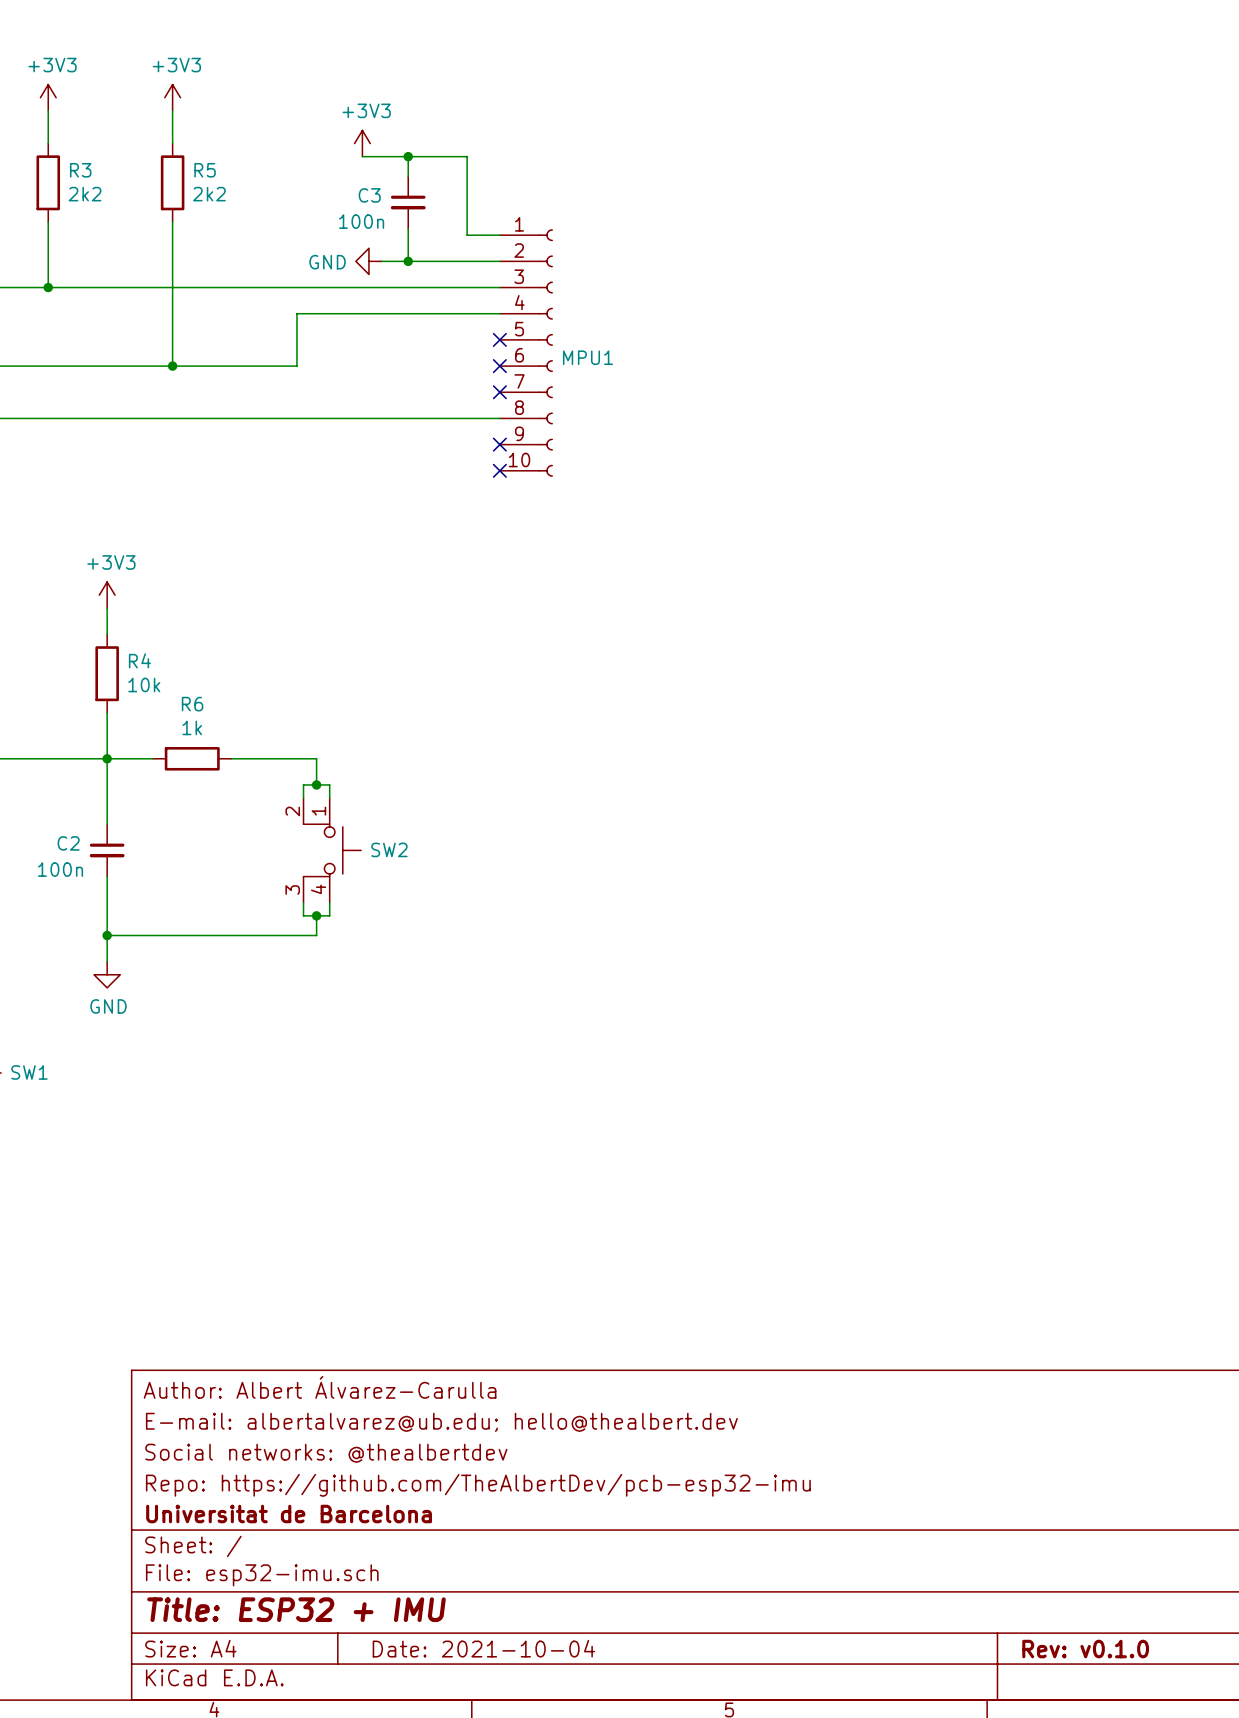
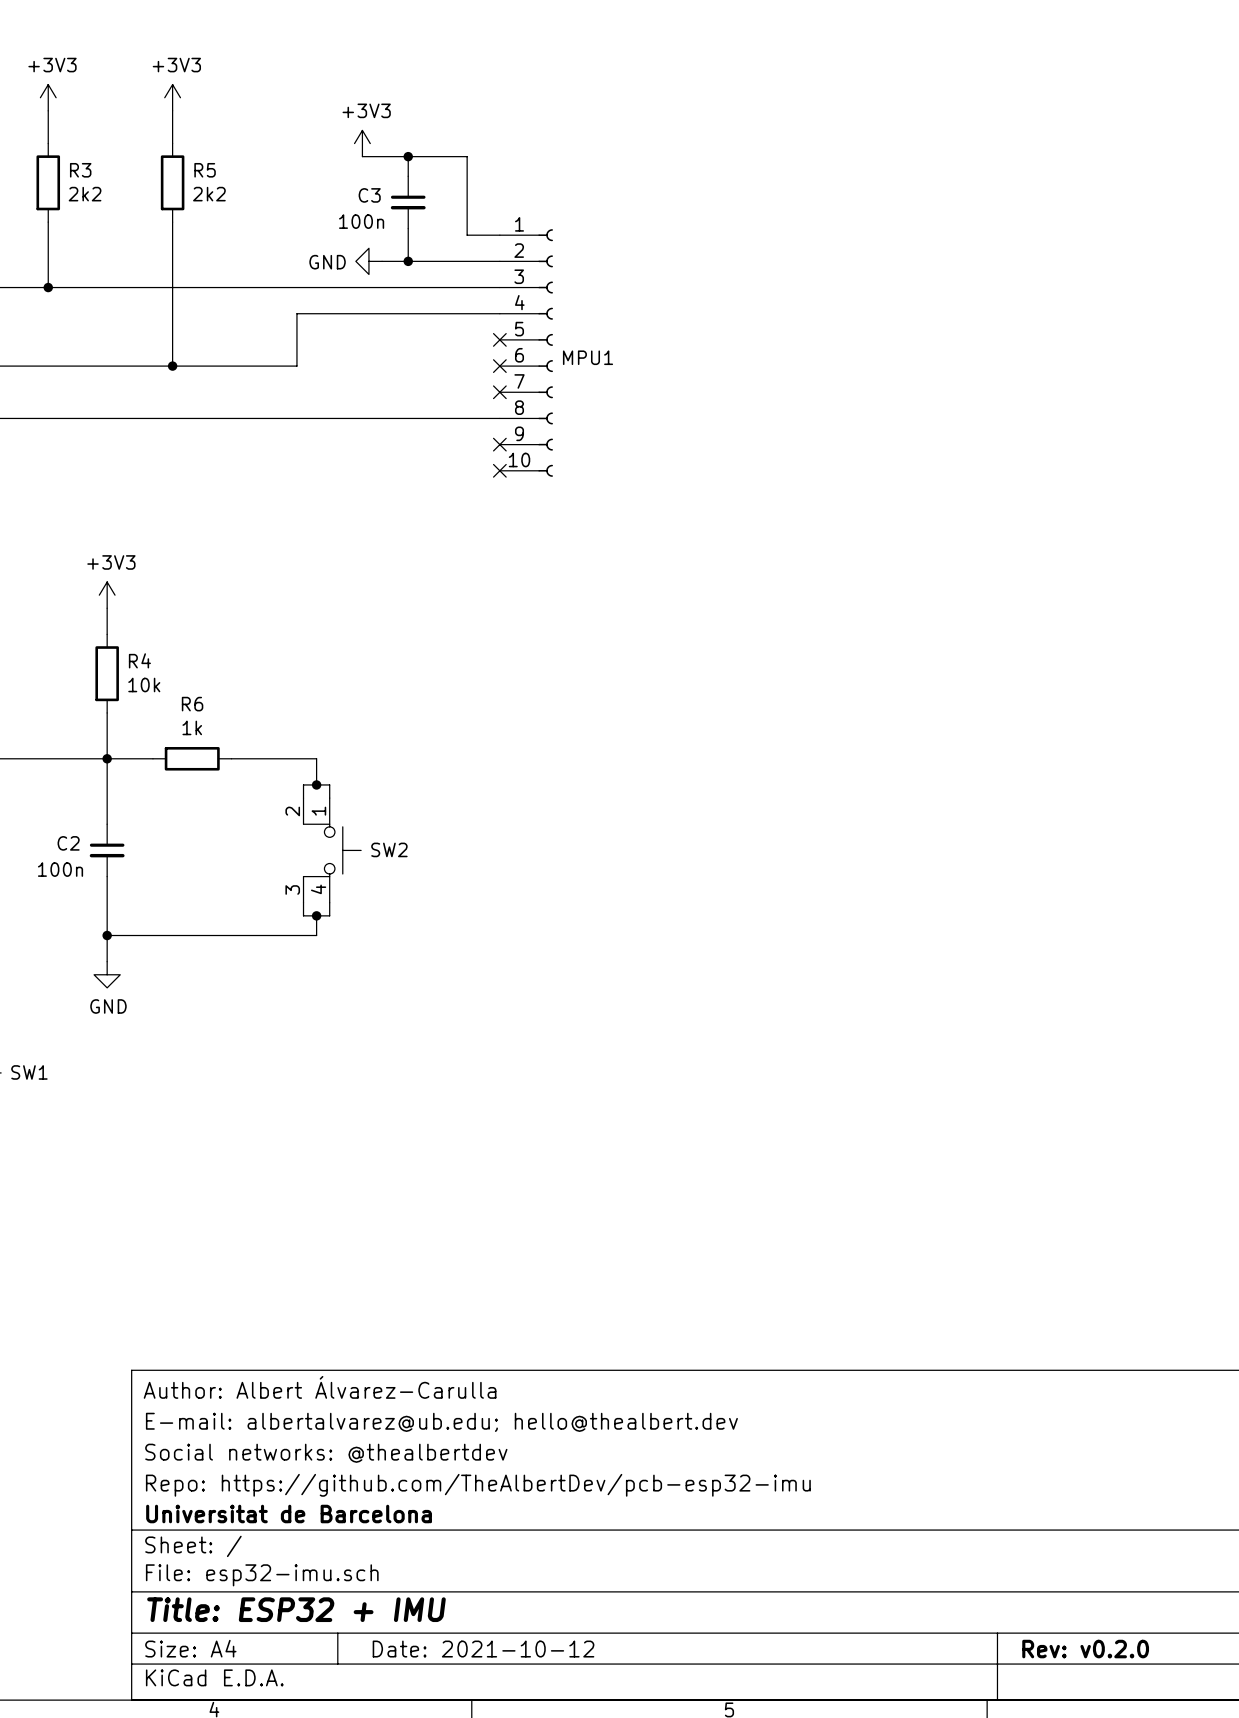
title block: Date: 2021-10-04 (483, 1648) -> Date: 2021-10-12 (483, 1649)
title block: Rev: v0.1.0 (1085, 1649) -> Rev: v0.2.0 (1085, 1649)

